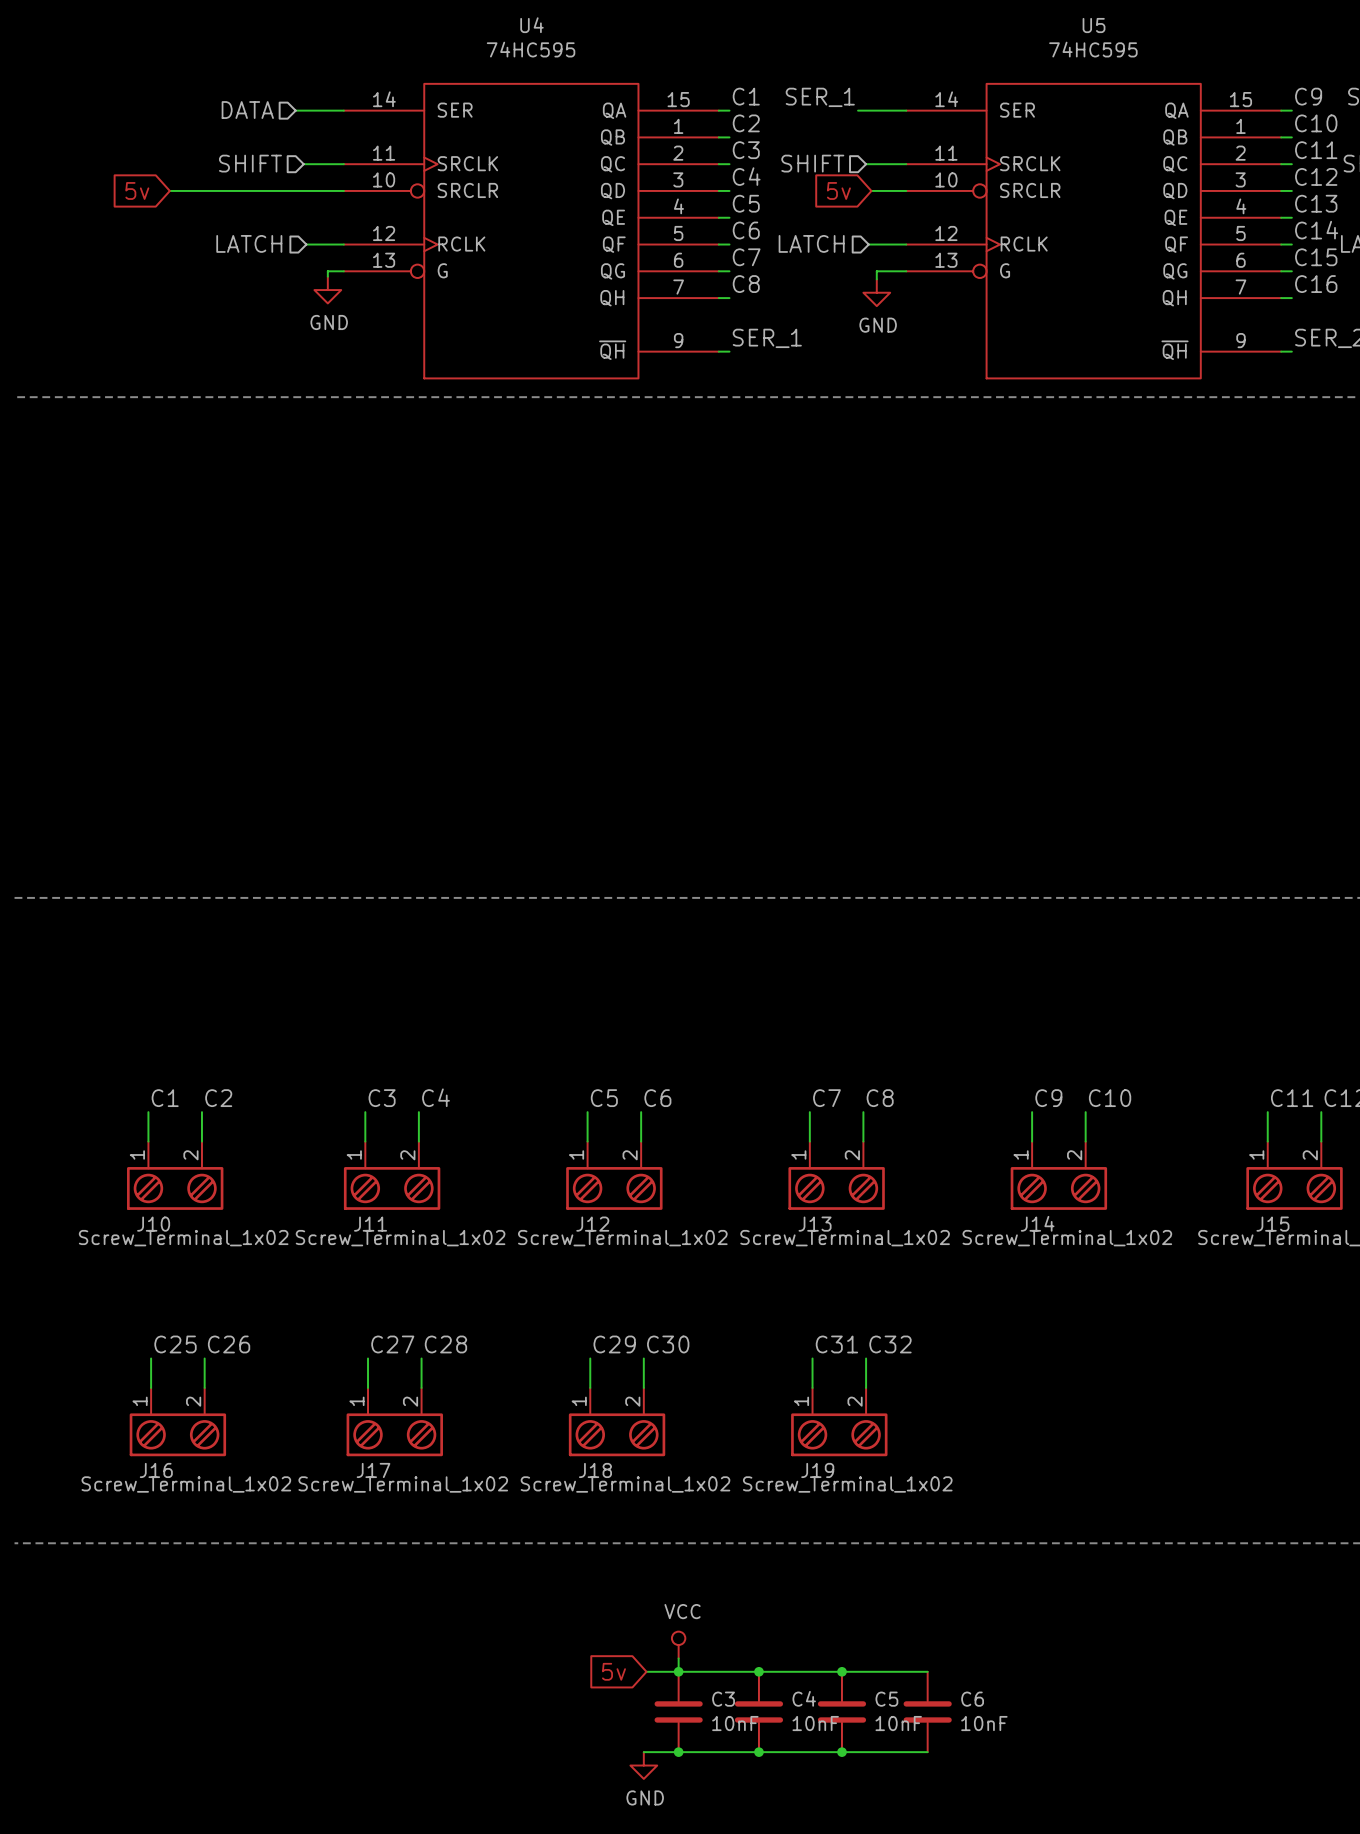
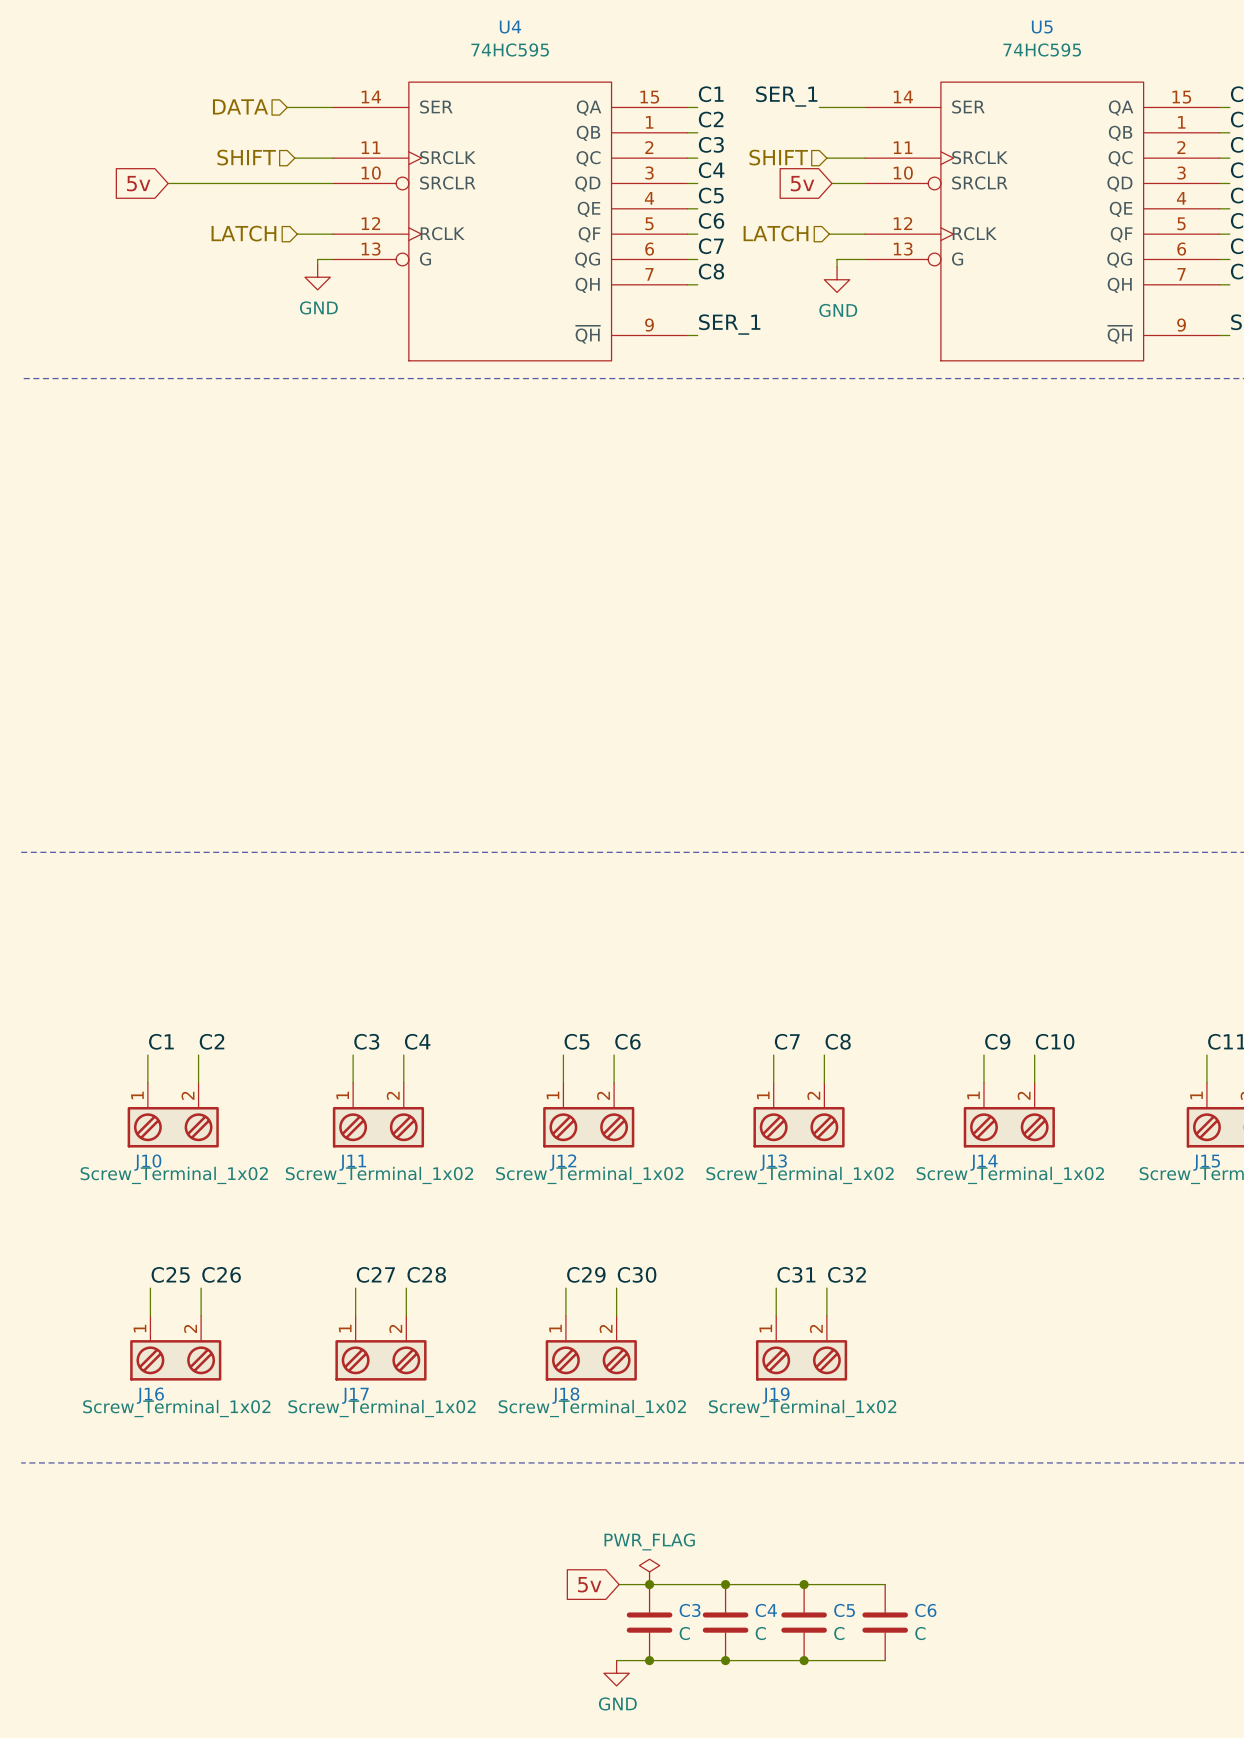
power symbol: VCC (678, 1645) -> none
power symbol: none -> PWR_FLAG (649, 1571)
C3 value: 10nF (735, 1723) -> C (684, 1633)
C4 value: 10nF (815, 1723) -> C (760, 1633)
C5 value: 10nF (898, 1723) -> C (839, 1633)
C6 value: 10nF (984, 1723) -> C (920, 1633)

